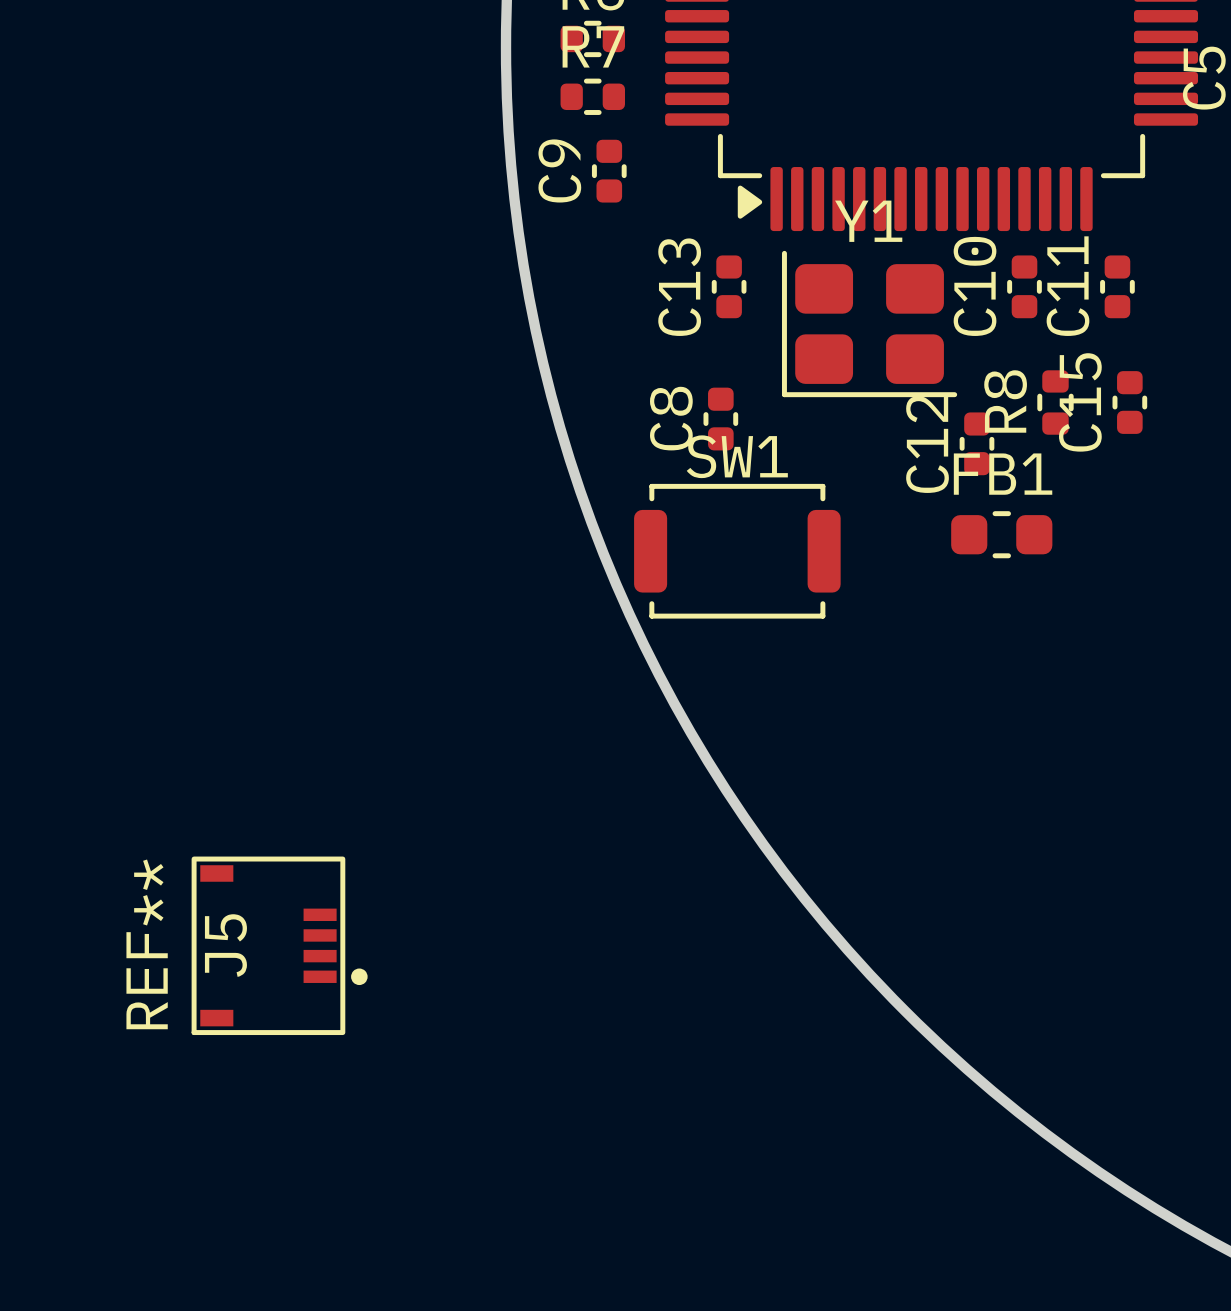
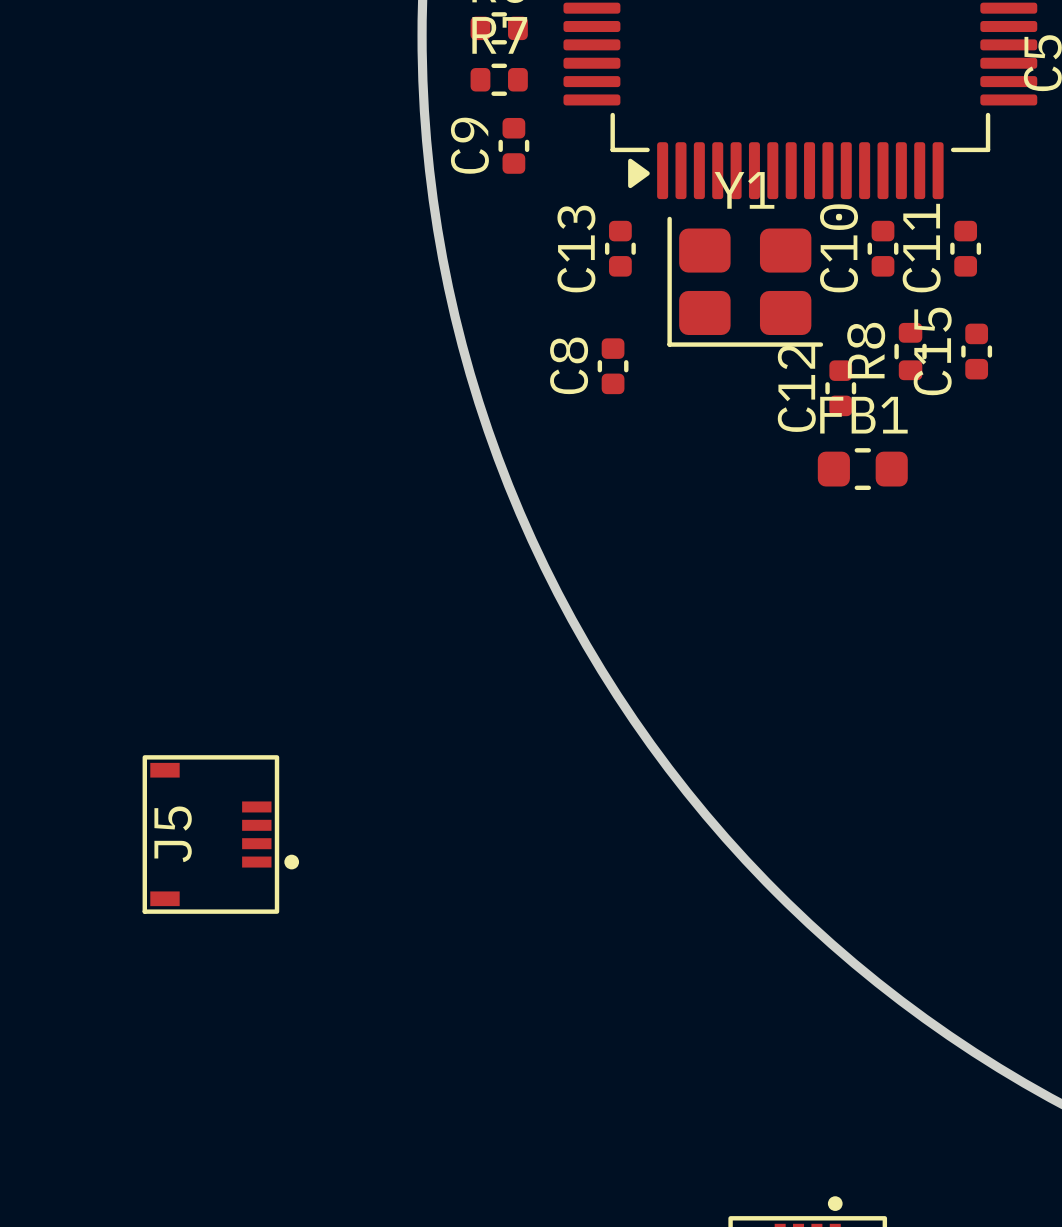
SW1: (737, 551) -> none
J5 text: REF** (147, 944) -> none

